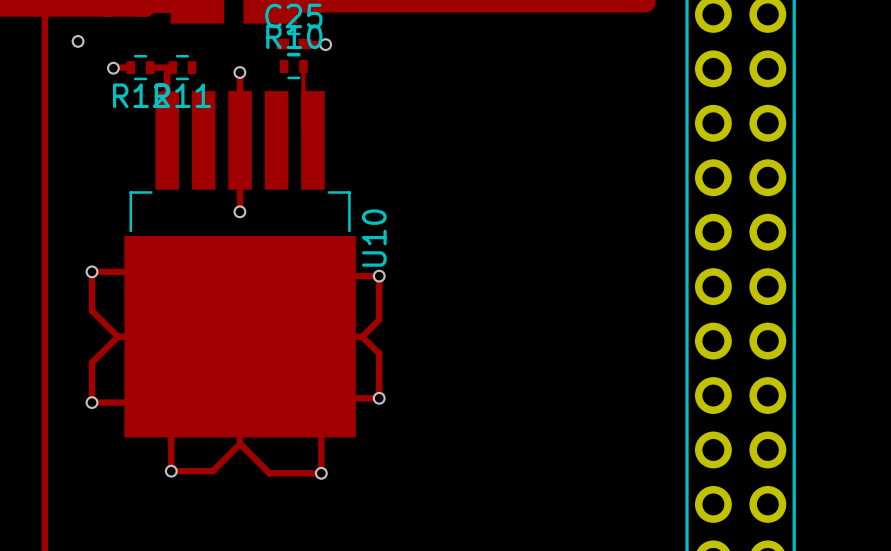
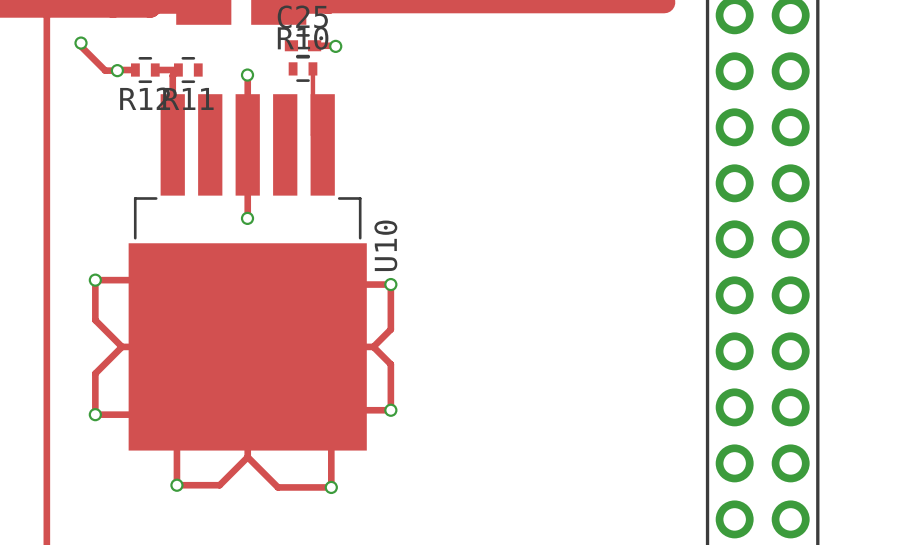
track: none -> (78, 44) (105, 70) (117, 70)

